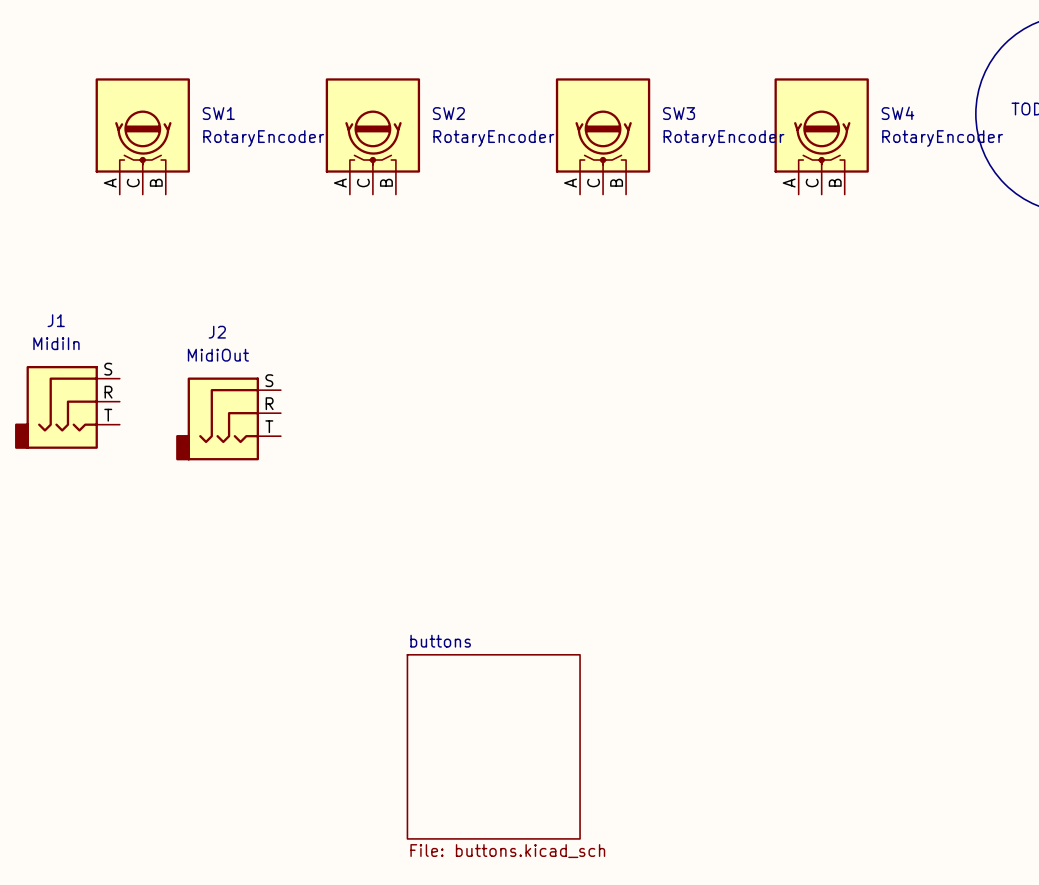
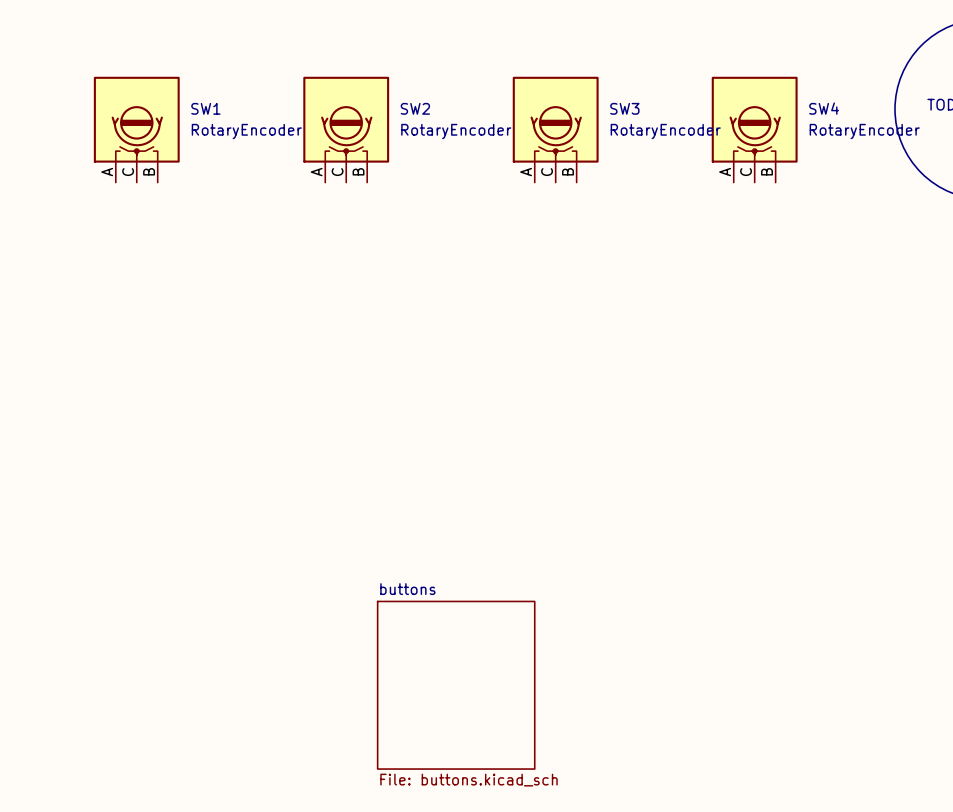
J1: MidiIn (67, 407) -> none
J2: MidiOut (228, 418) -> none

